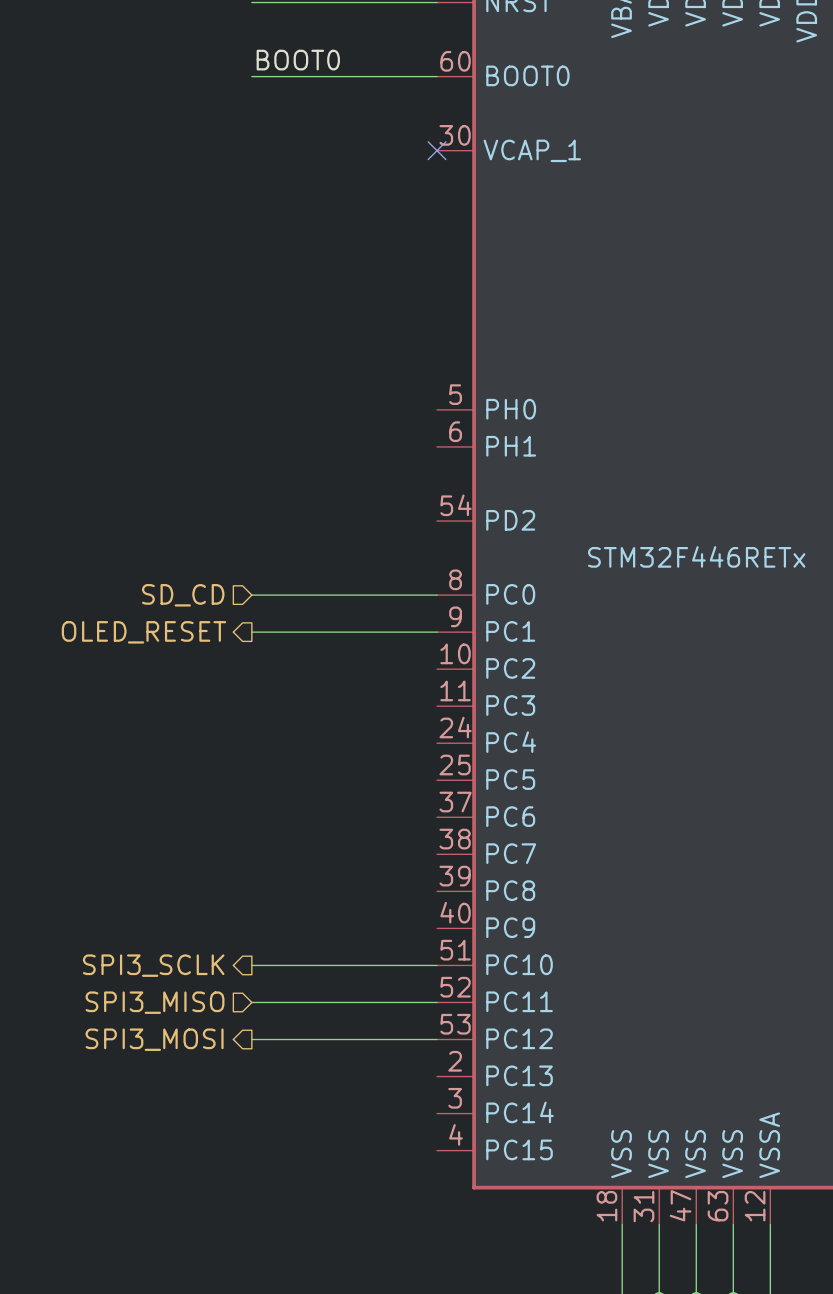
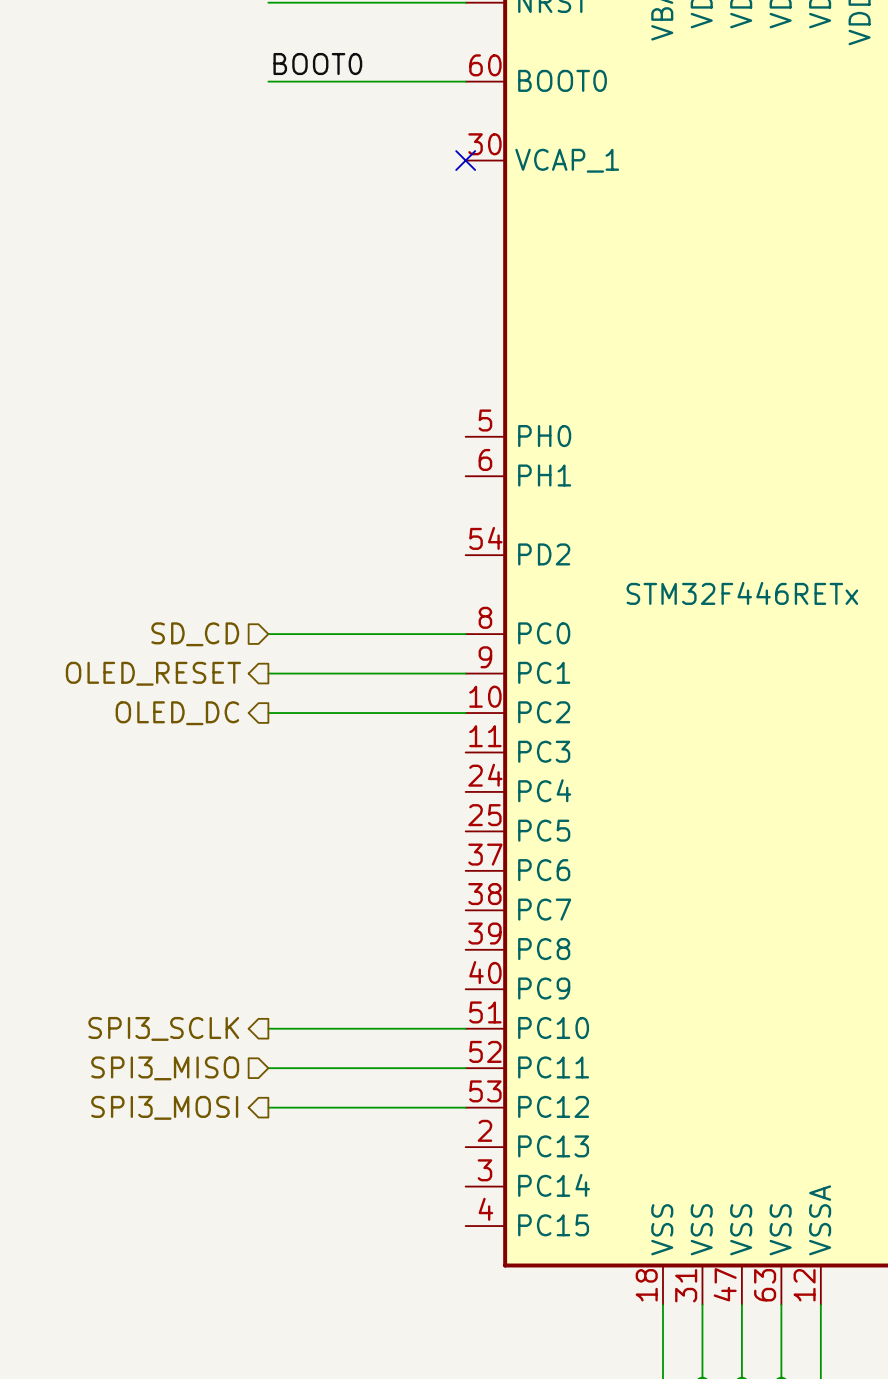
hierarchical label: none -> OLED_DC (177, 713)
wire: none -> (268, 713) (465, 713)

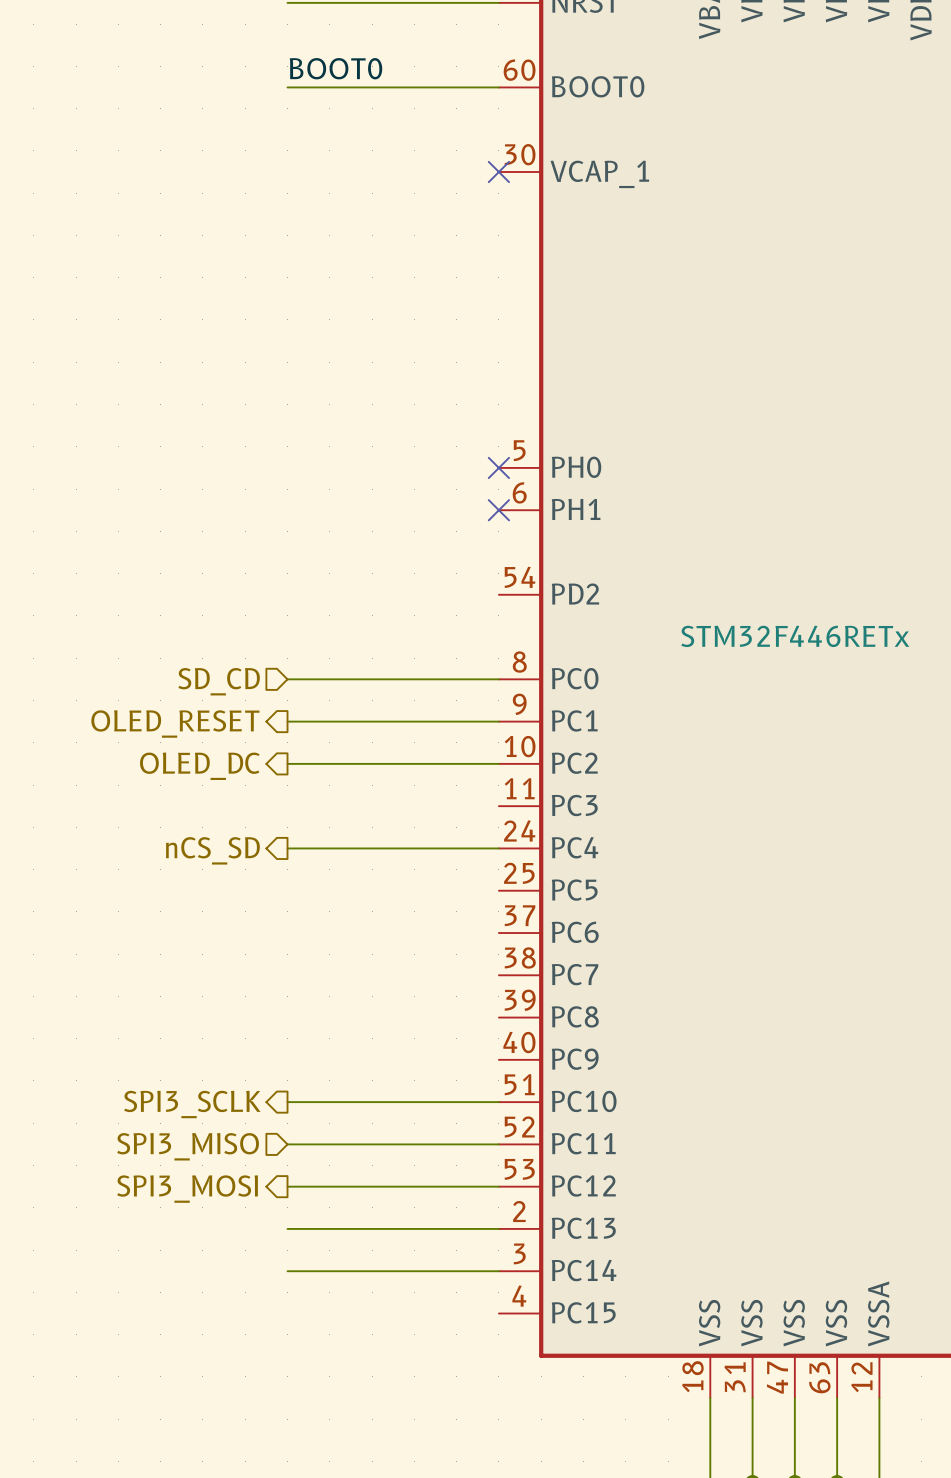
no-connect mark: none -> (498, 467)
no-connect mark: none -> (498, 510)
wire: none -> (287, 848) (498, 848)
hierarchical label: none -> nCS_SD (212, 850)
wire: none -> (287, 1228) (498, 1228)
wire: none -> (287, 1271) (498, 1271)

